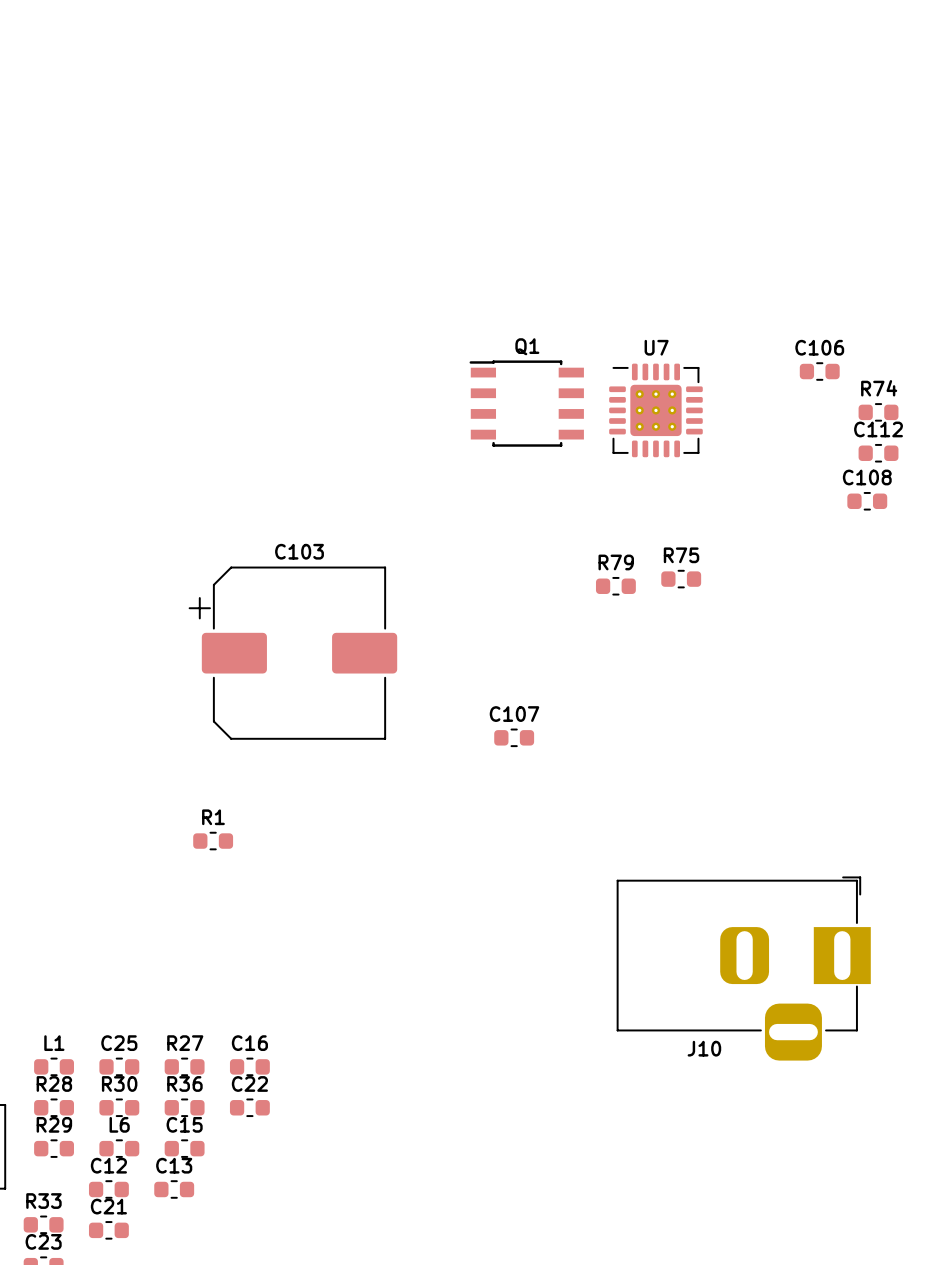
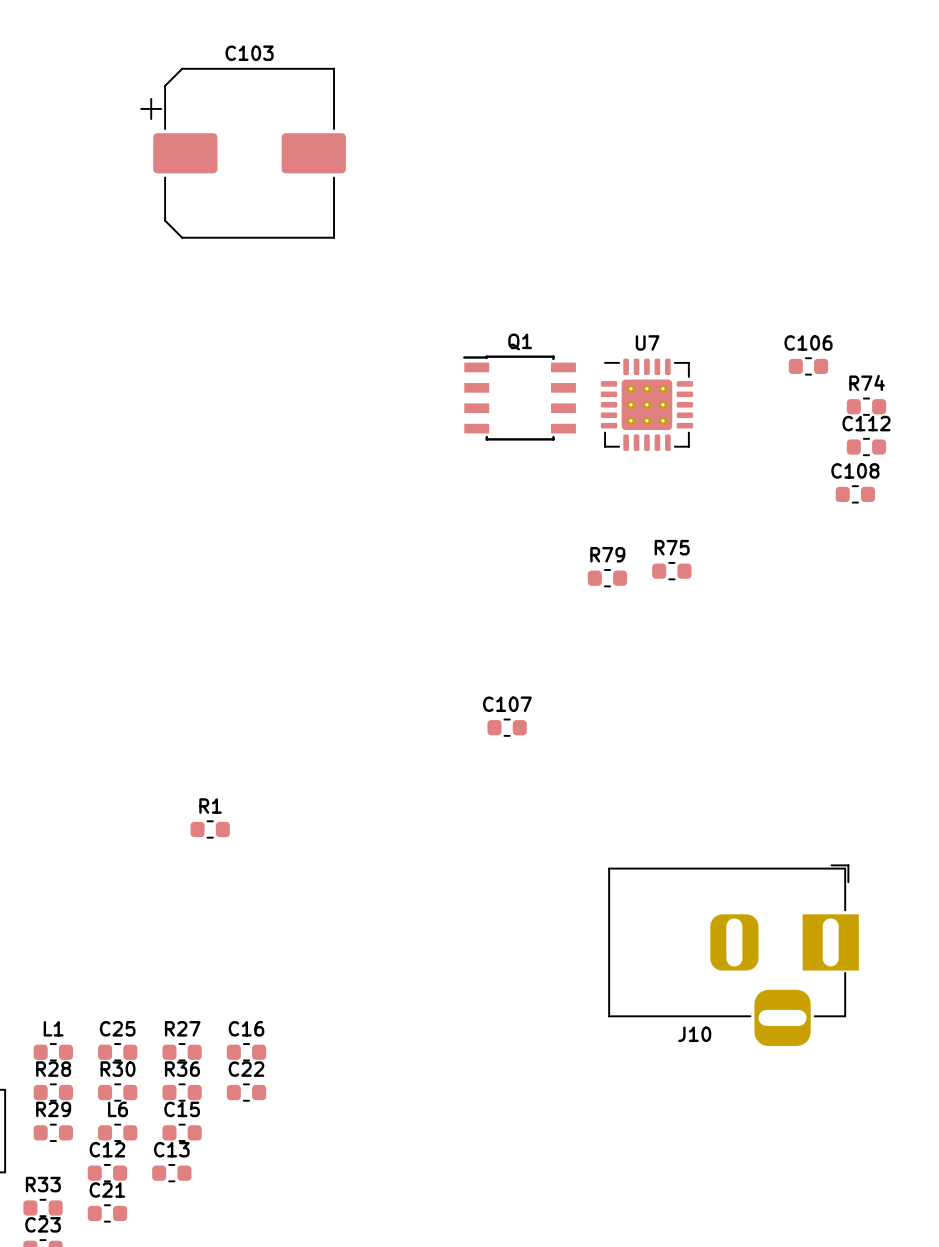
C103 position: (292, 653) -> (243, 153)

